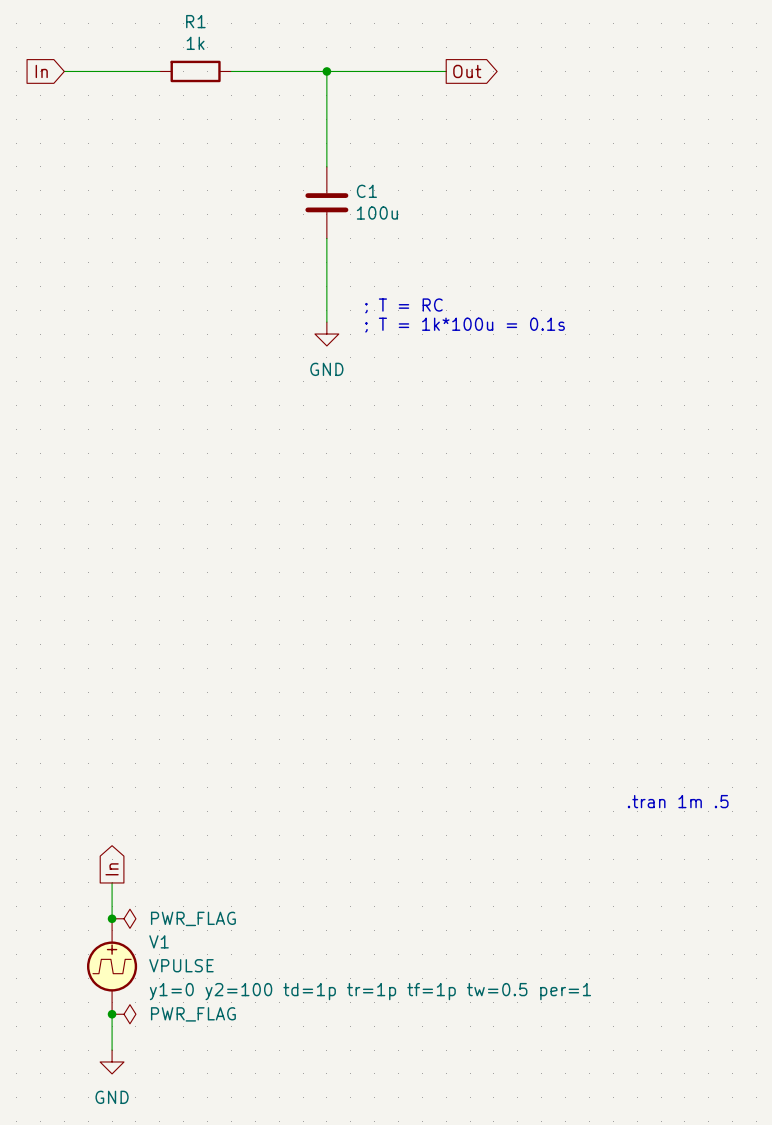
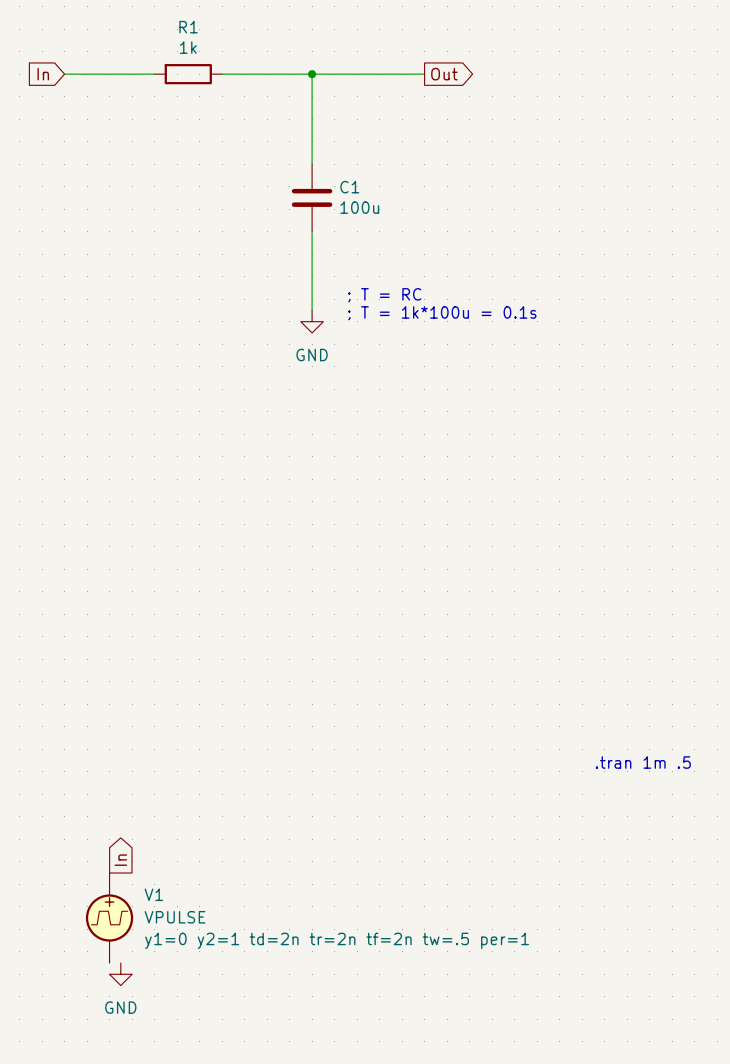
global label position: In (112, 869) -> In (120, 860)
junction: (112, 918) -> none
power symbol: PWR_FLAG (123, 918) -> none
V1 text: y1=0 y2=100 td=1p tr=1p tf=1p tw=0.5 per=1 (370, 991) -> y1=0 y2=1 td=2n tr=2n tf=2n tw=.5 per=1 (337, 940)
wire: (112, 1014) (112, 1050) -> none
junction: (112, 1014) -> none
power symbol: PWR_FLAG (123, 1014) -> none
power symbol position: GND (112, 1061) -> GND (120, 974)

